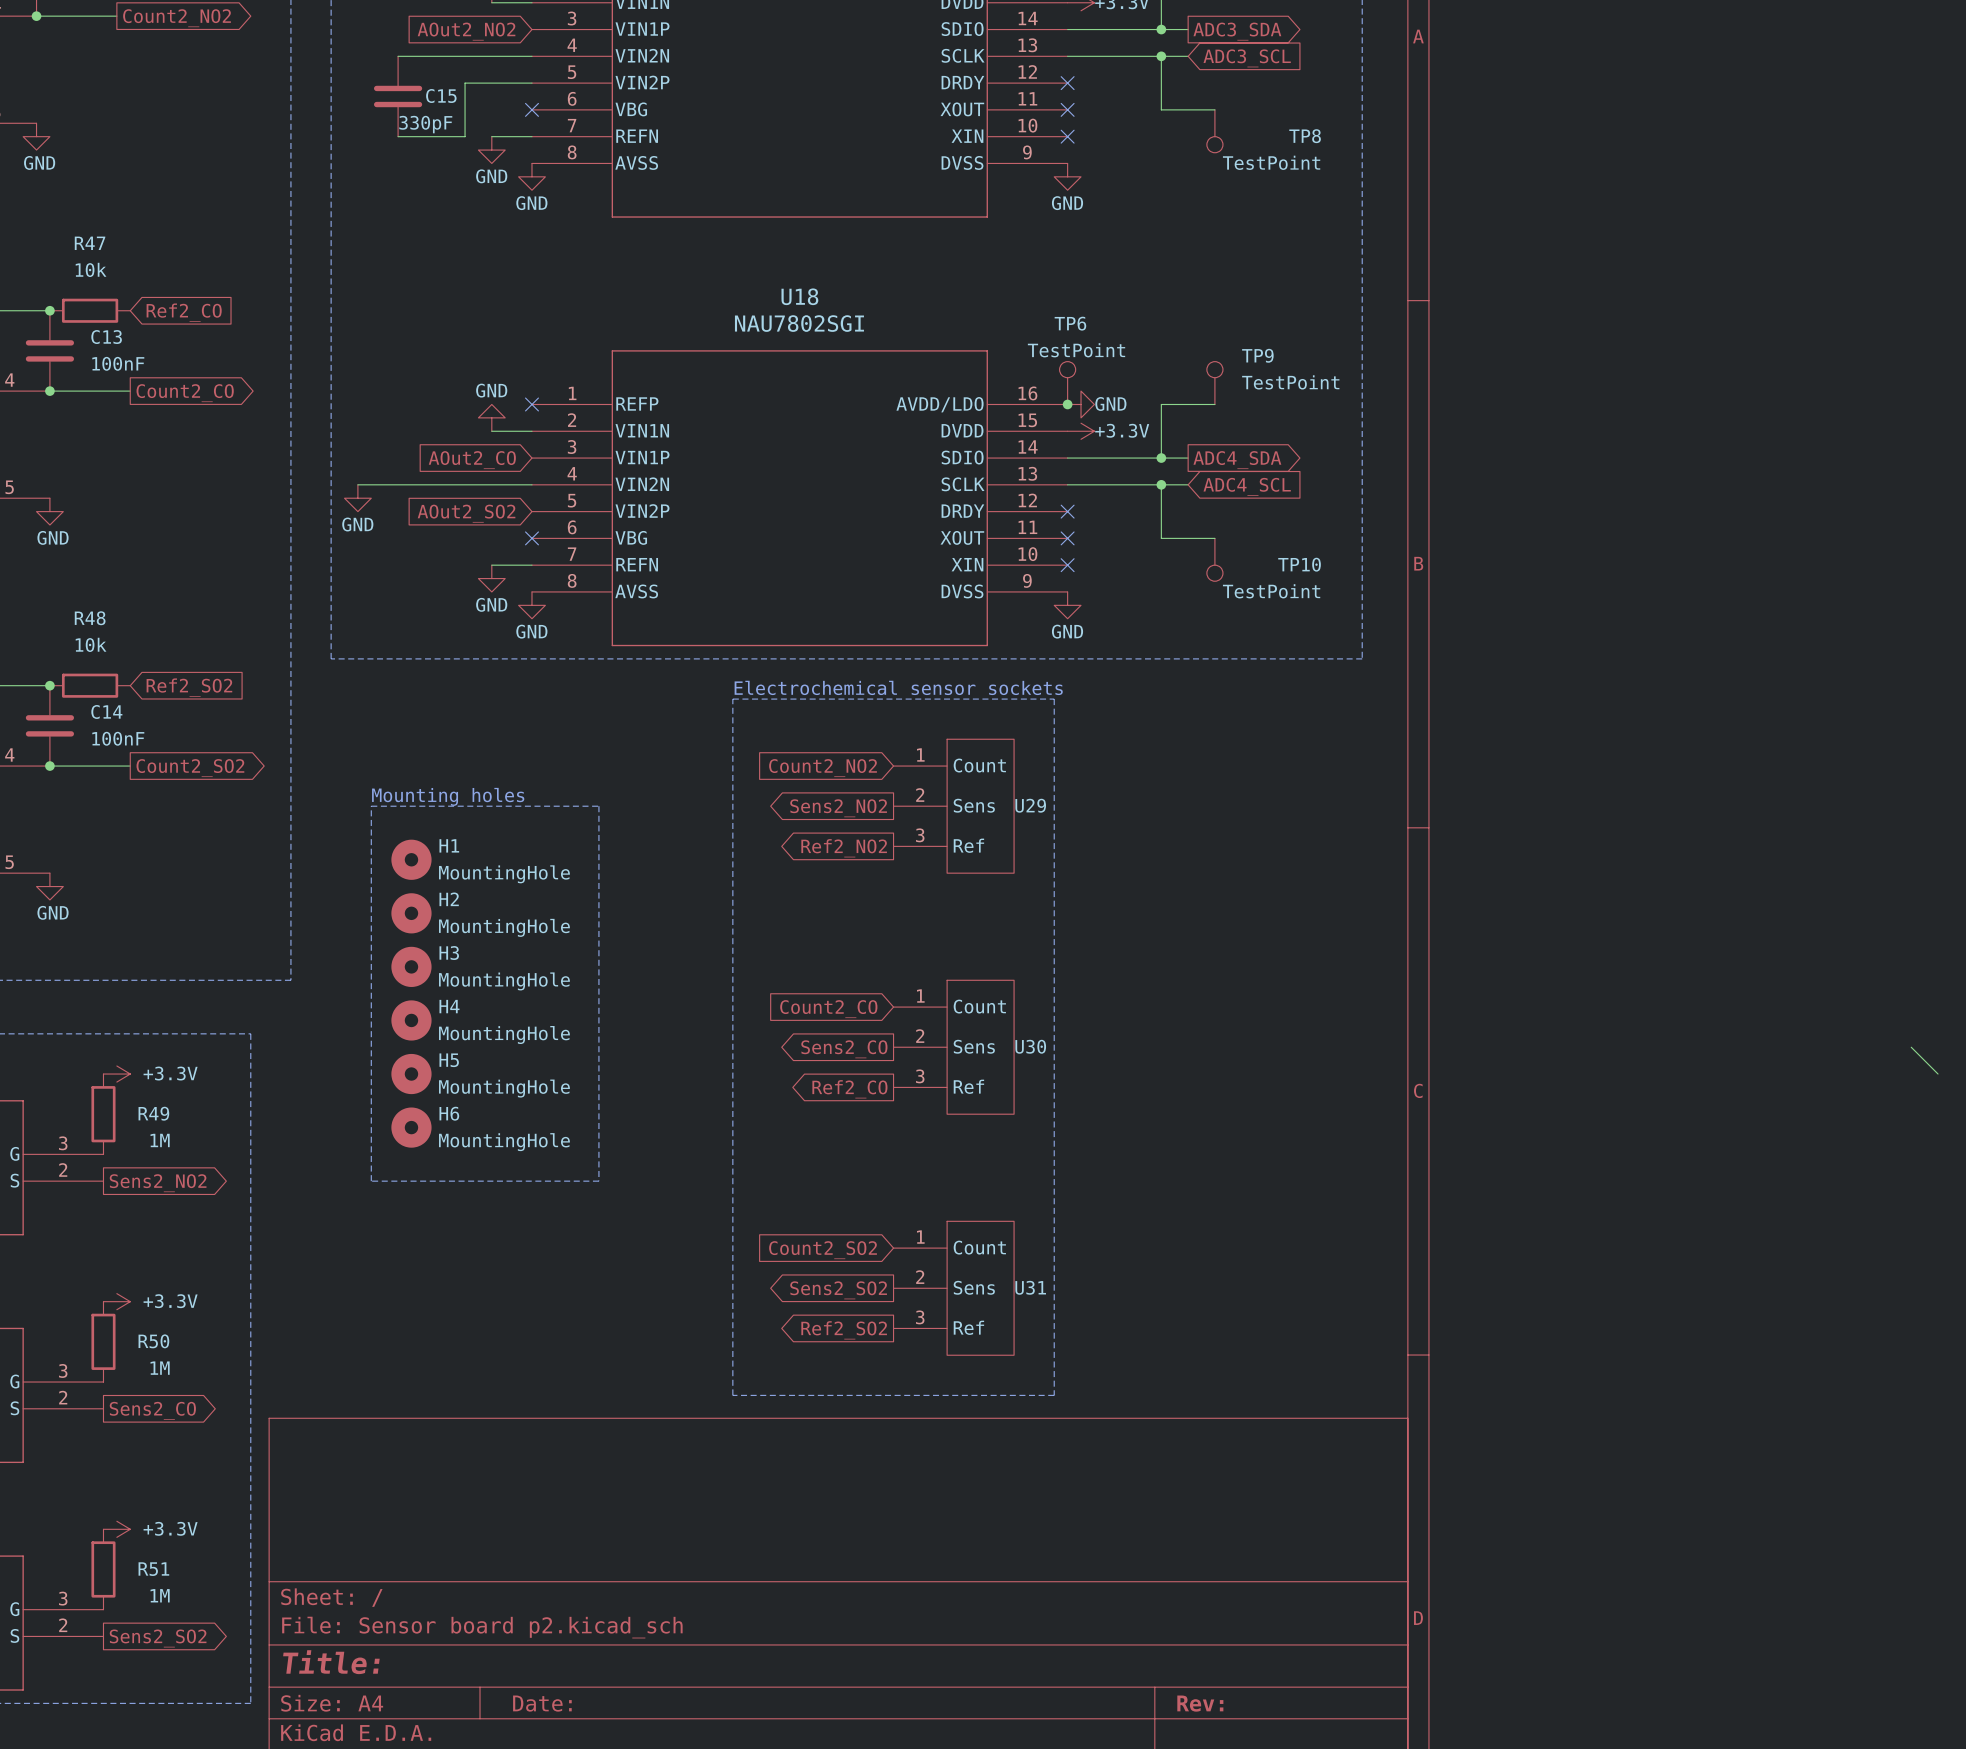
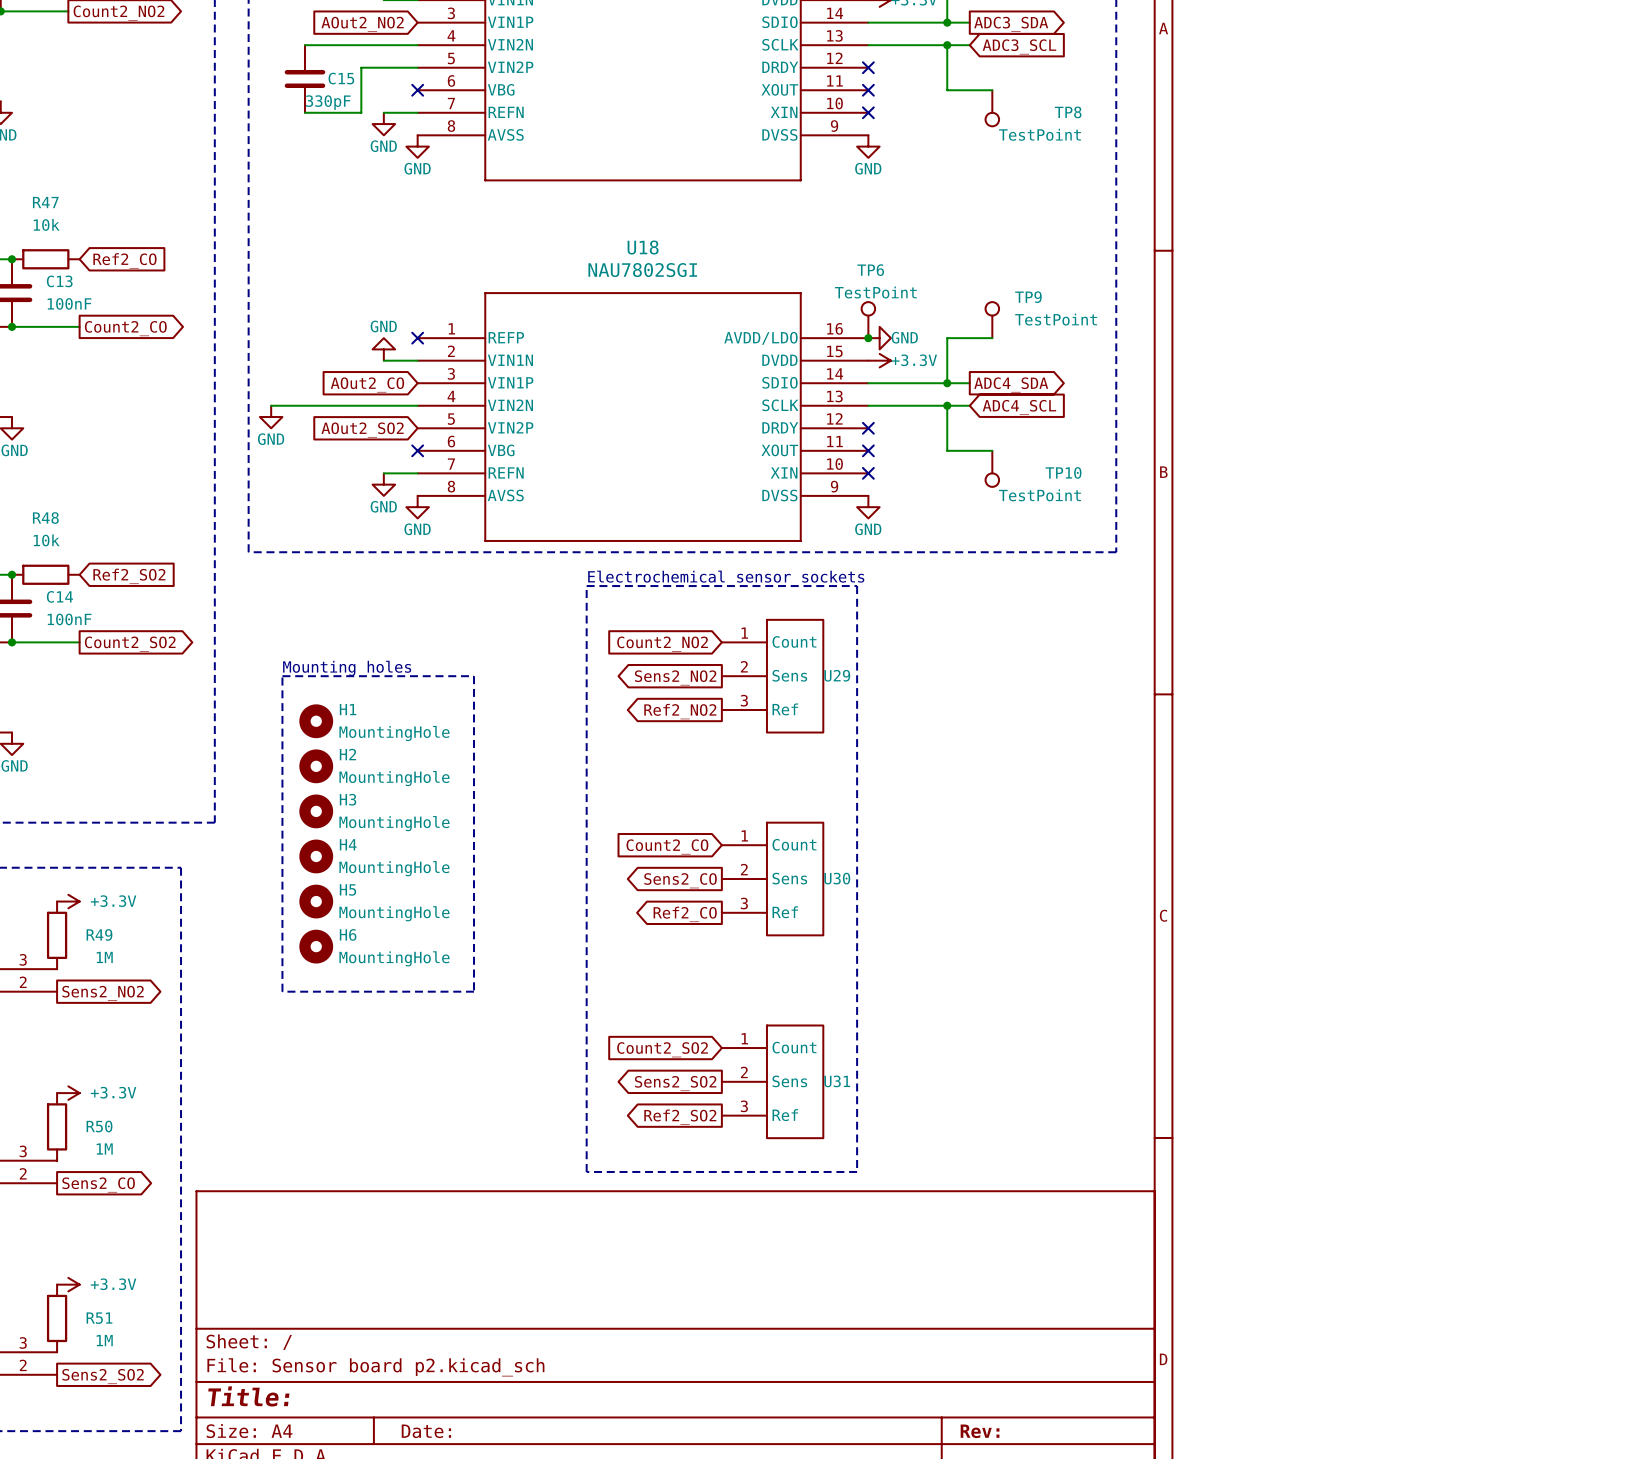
wire: (1911, 1047) (1938, 1074) -> none

